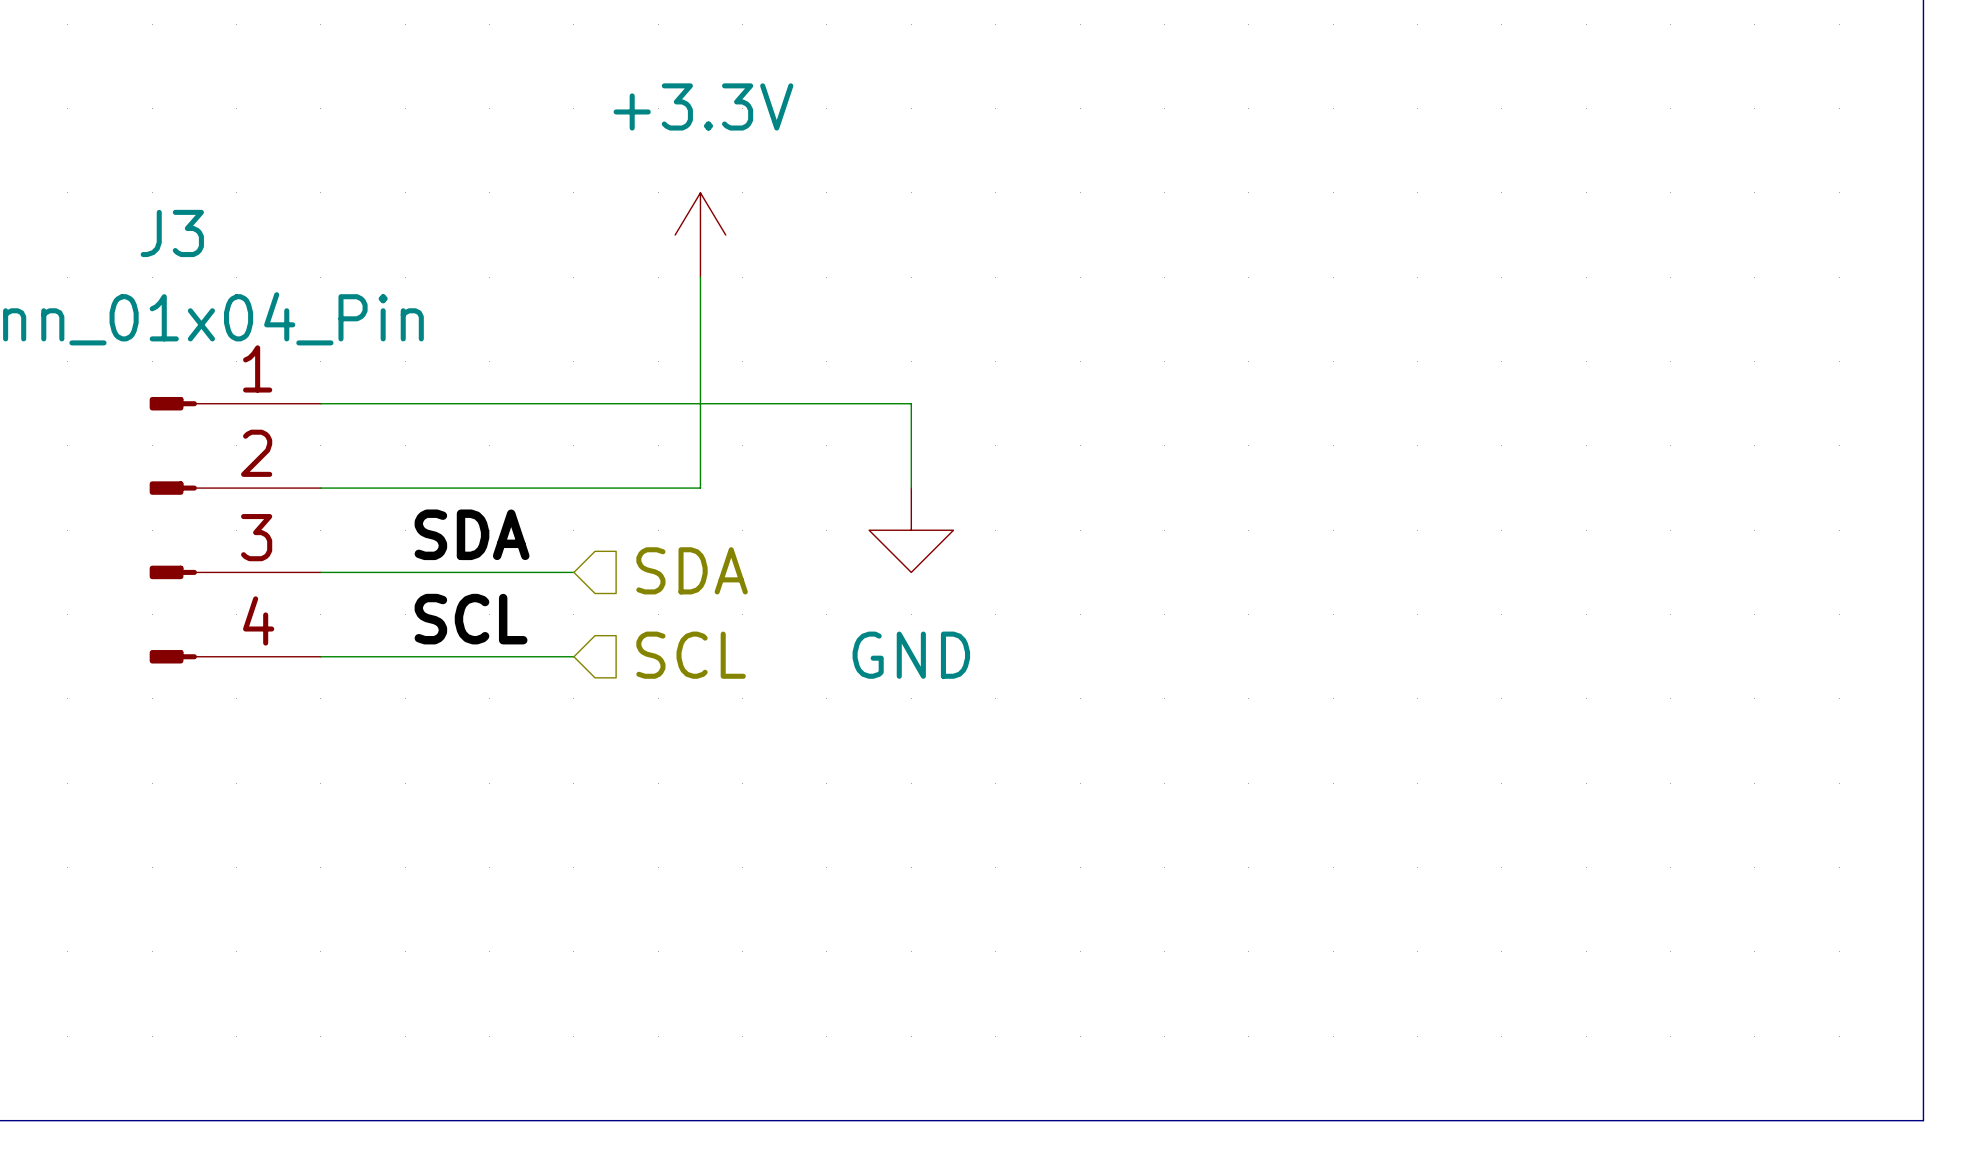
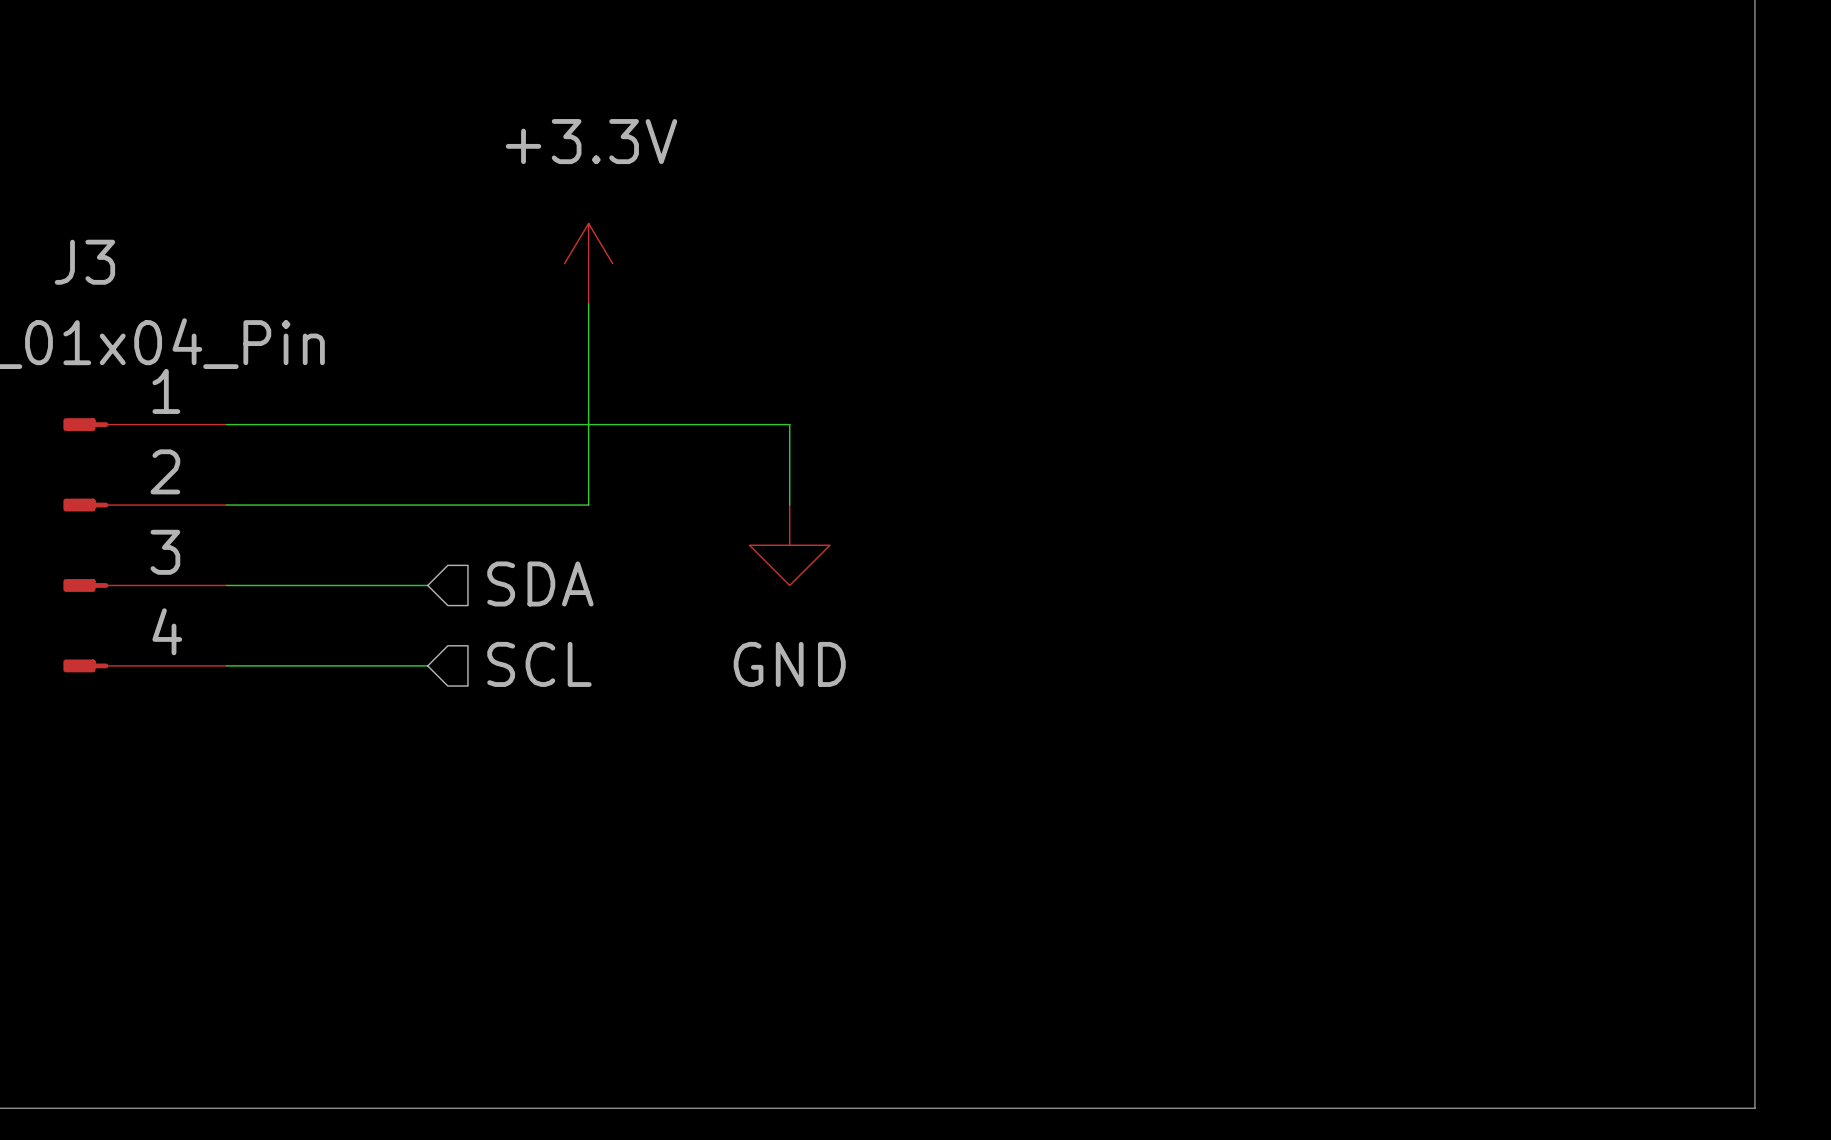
label: SDA (472, 534) -> none
hierarchical label position: SDA (692, 570) -> SDA (540, 583)
wire: (531, 572) (573, 572) -> none
label: SCL (471, 619) -> none
hierarchical label position: SCL (691, 655) -> SCL (539, 664)
wire: (531, 656) (573, 656) -> none

